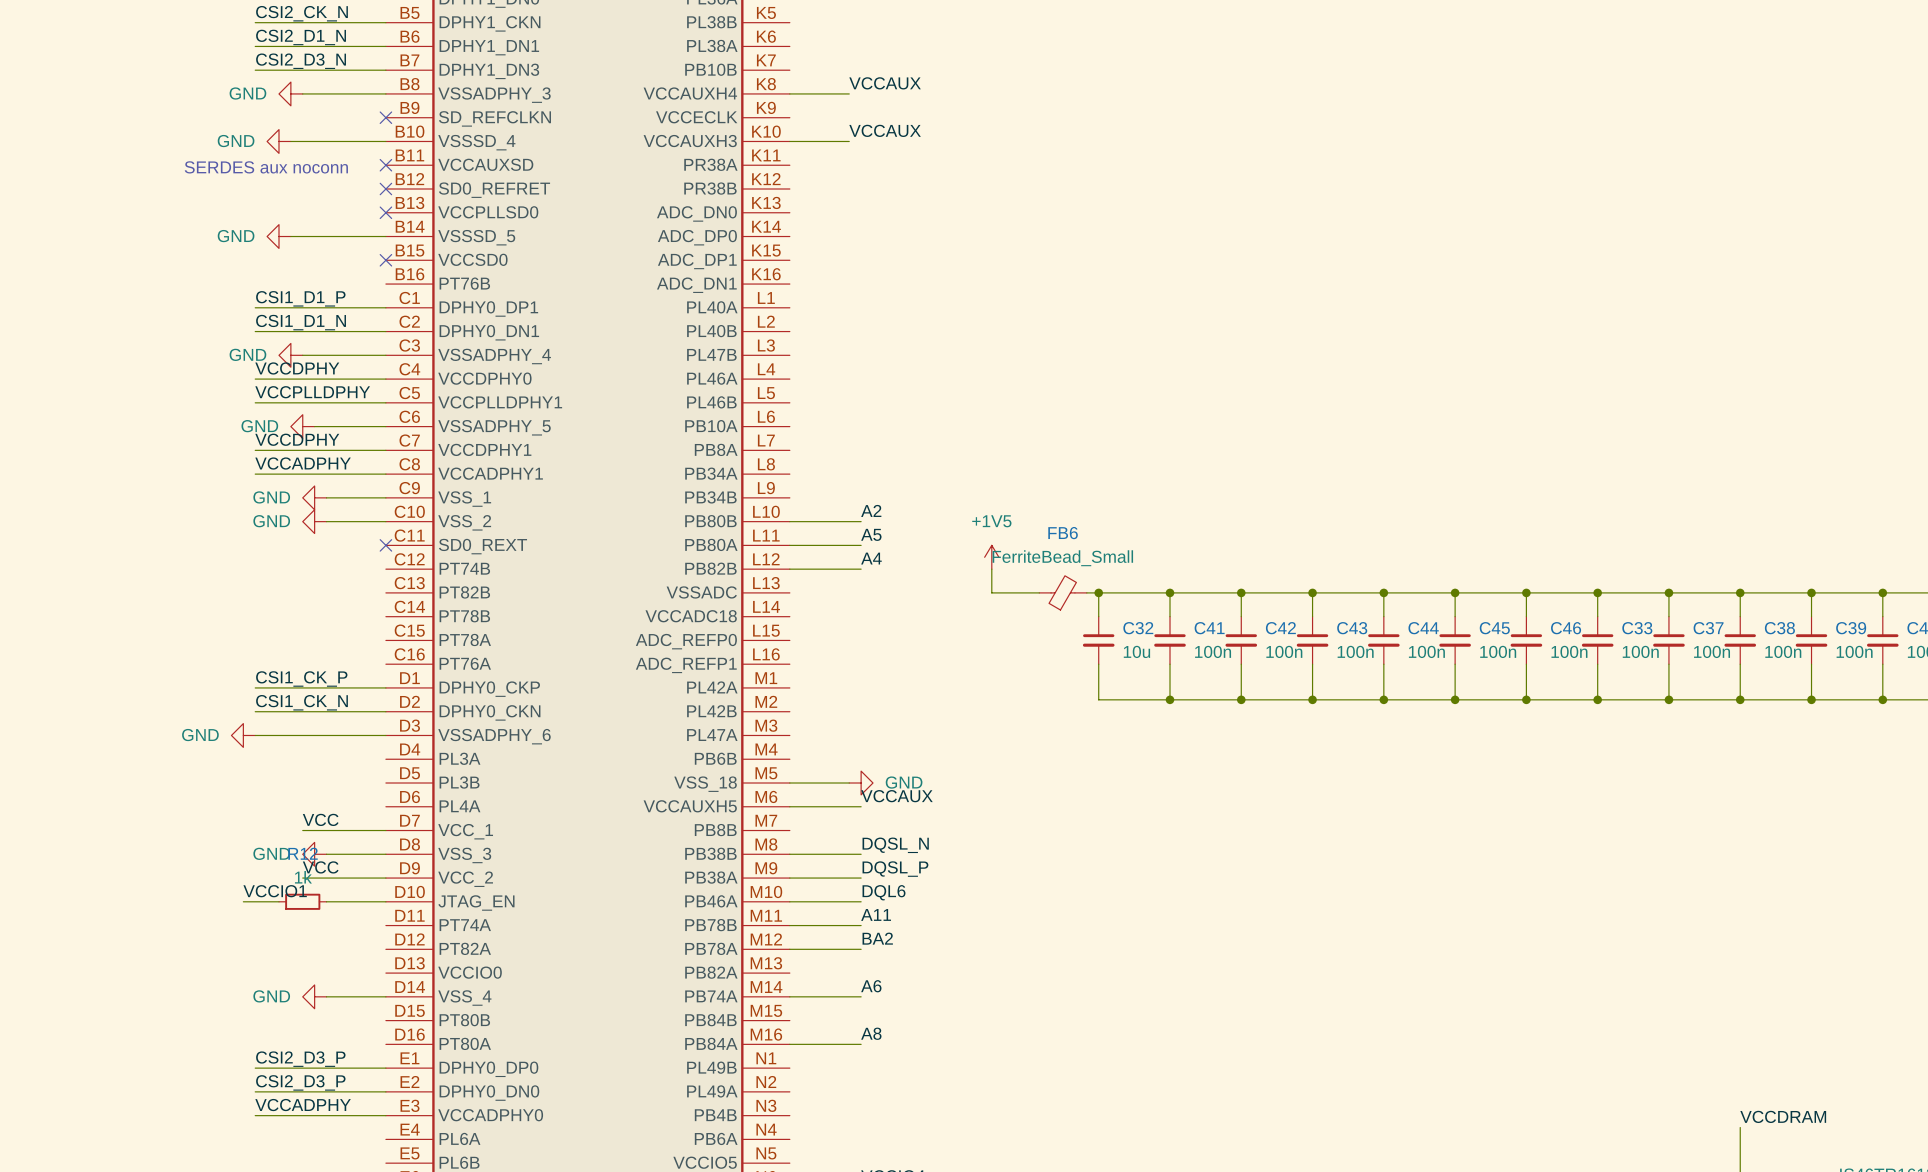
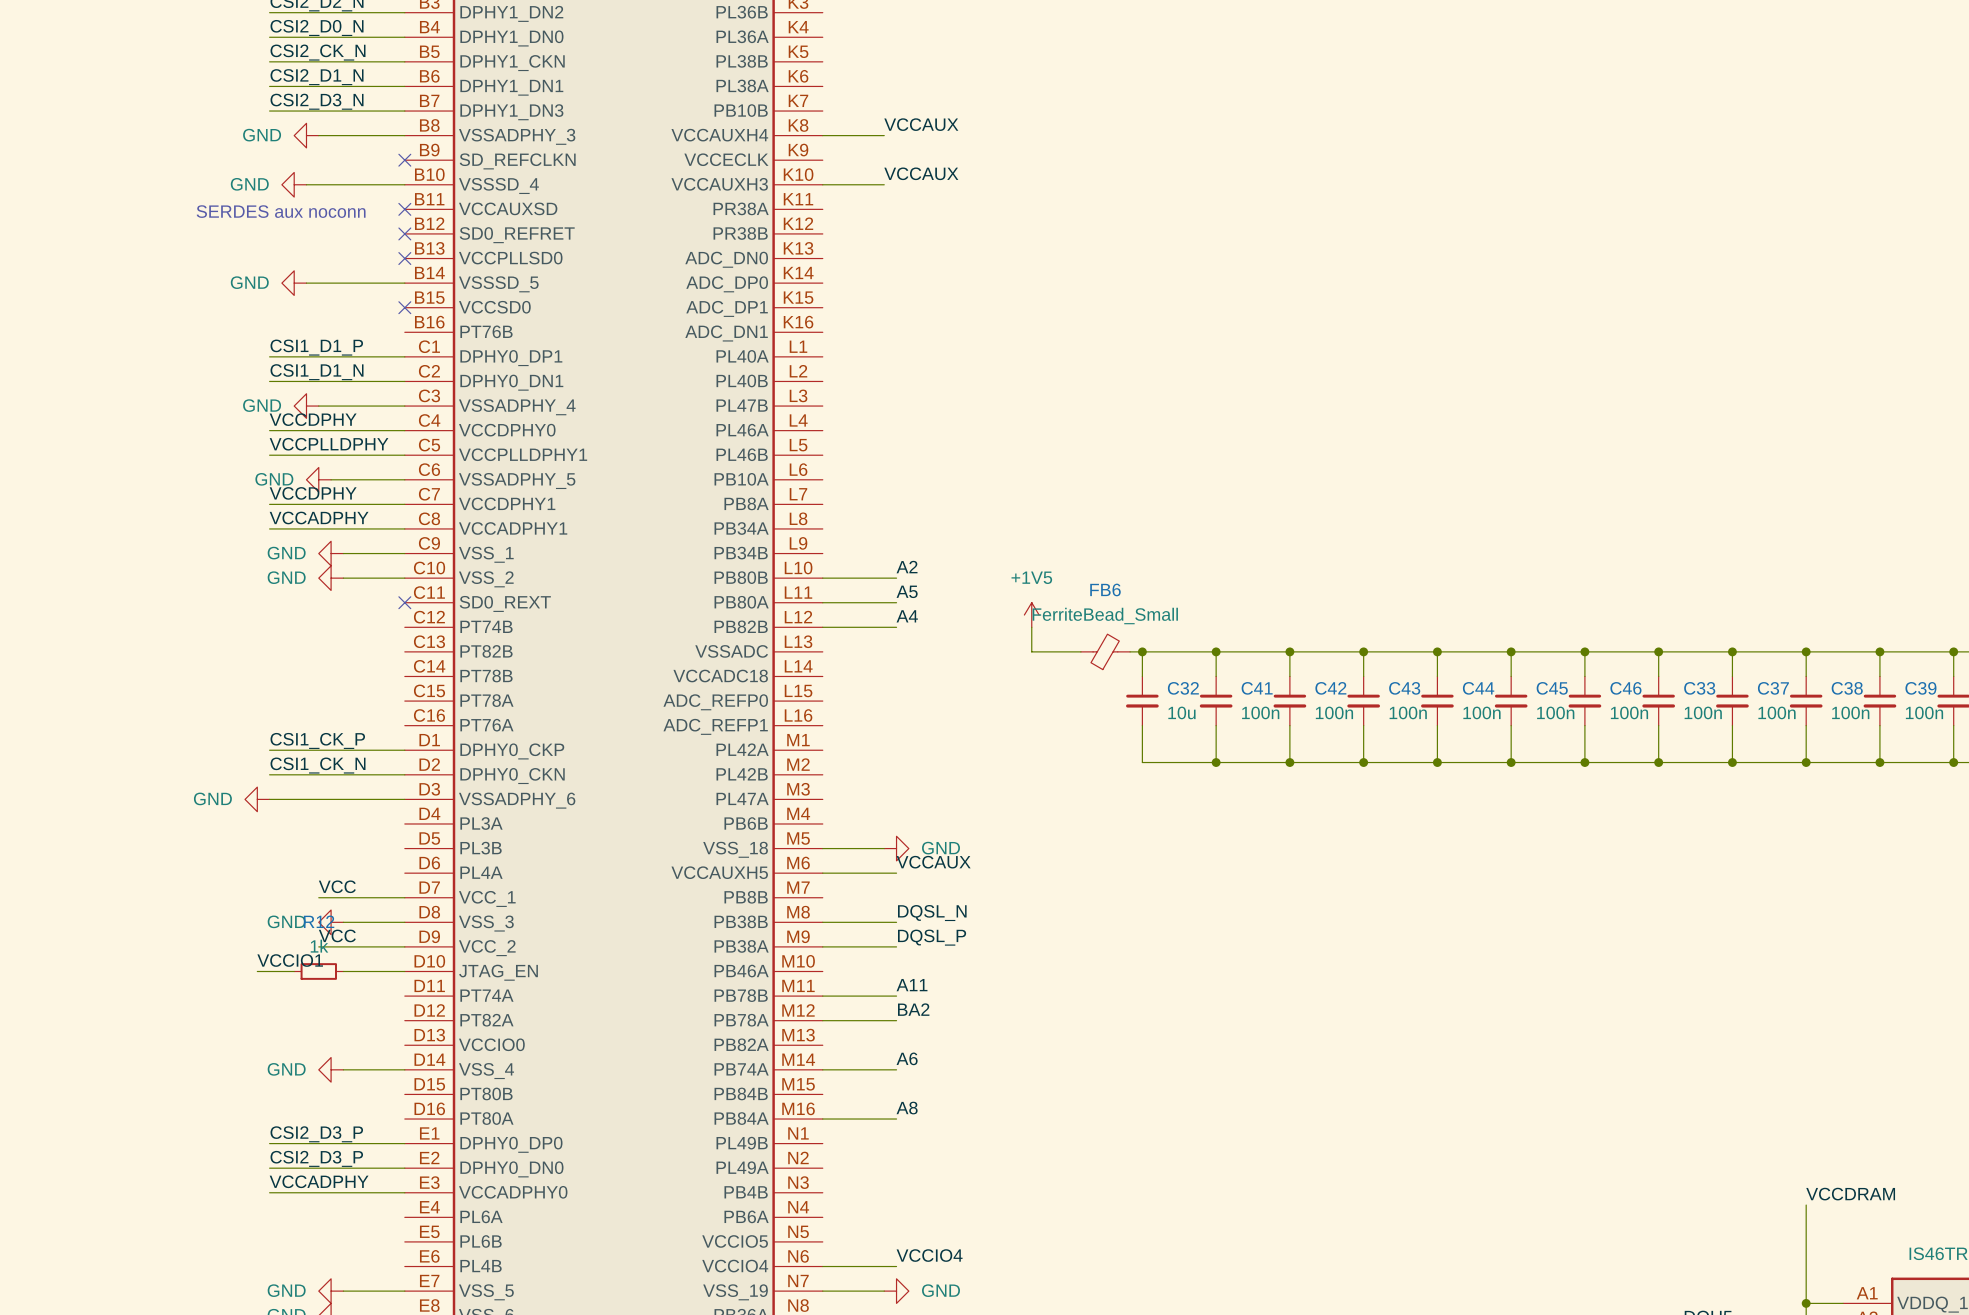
label: DQL6 (884, 892) -> none
wire: (789, 901) (861, 901) -> none

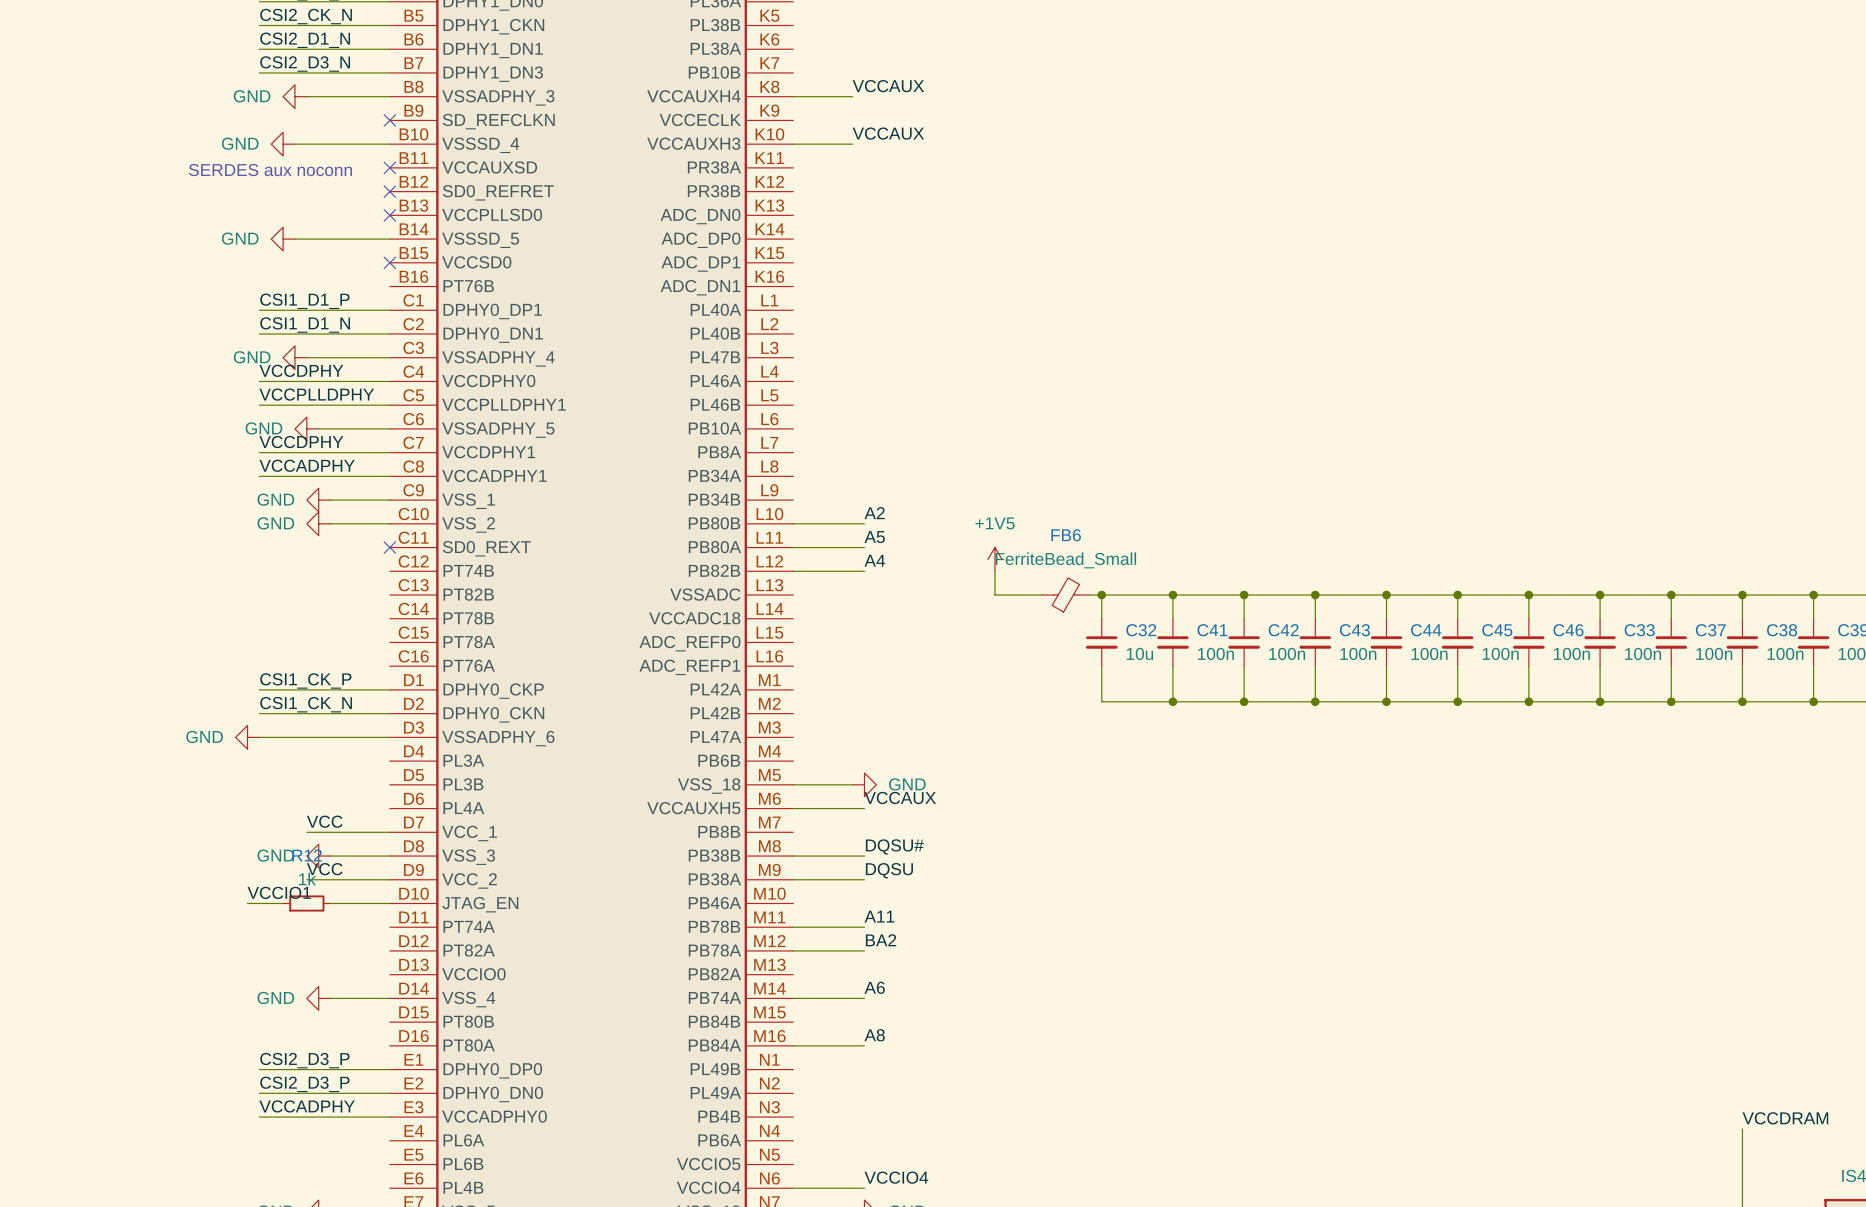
label: DQSL_N (932, 913) -> DQSU# (894, 846)
label: DQSL_P (932, 937) -> DQSU (889, 870)

